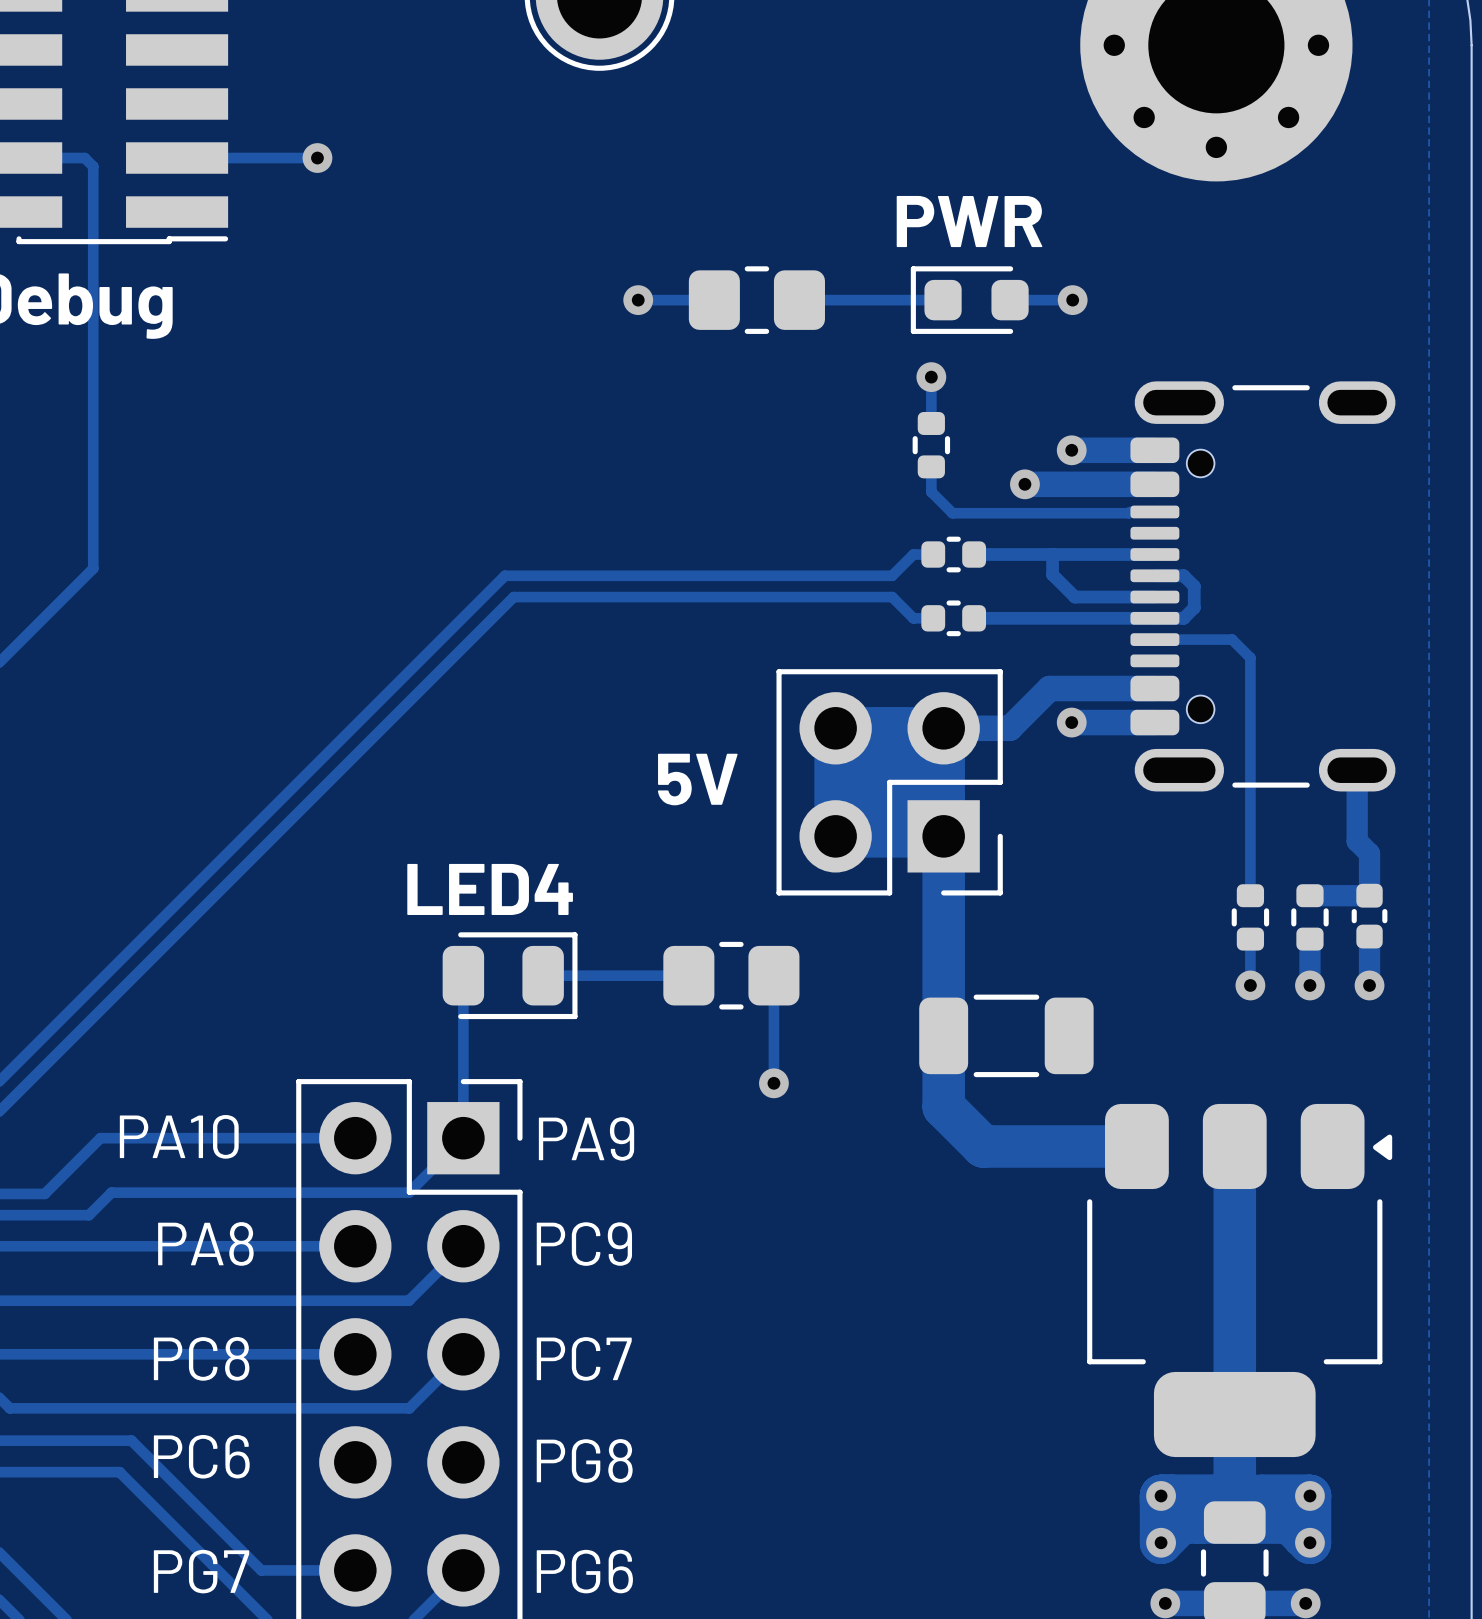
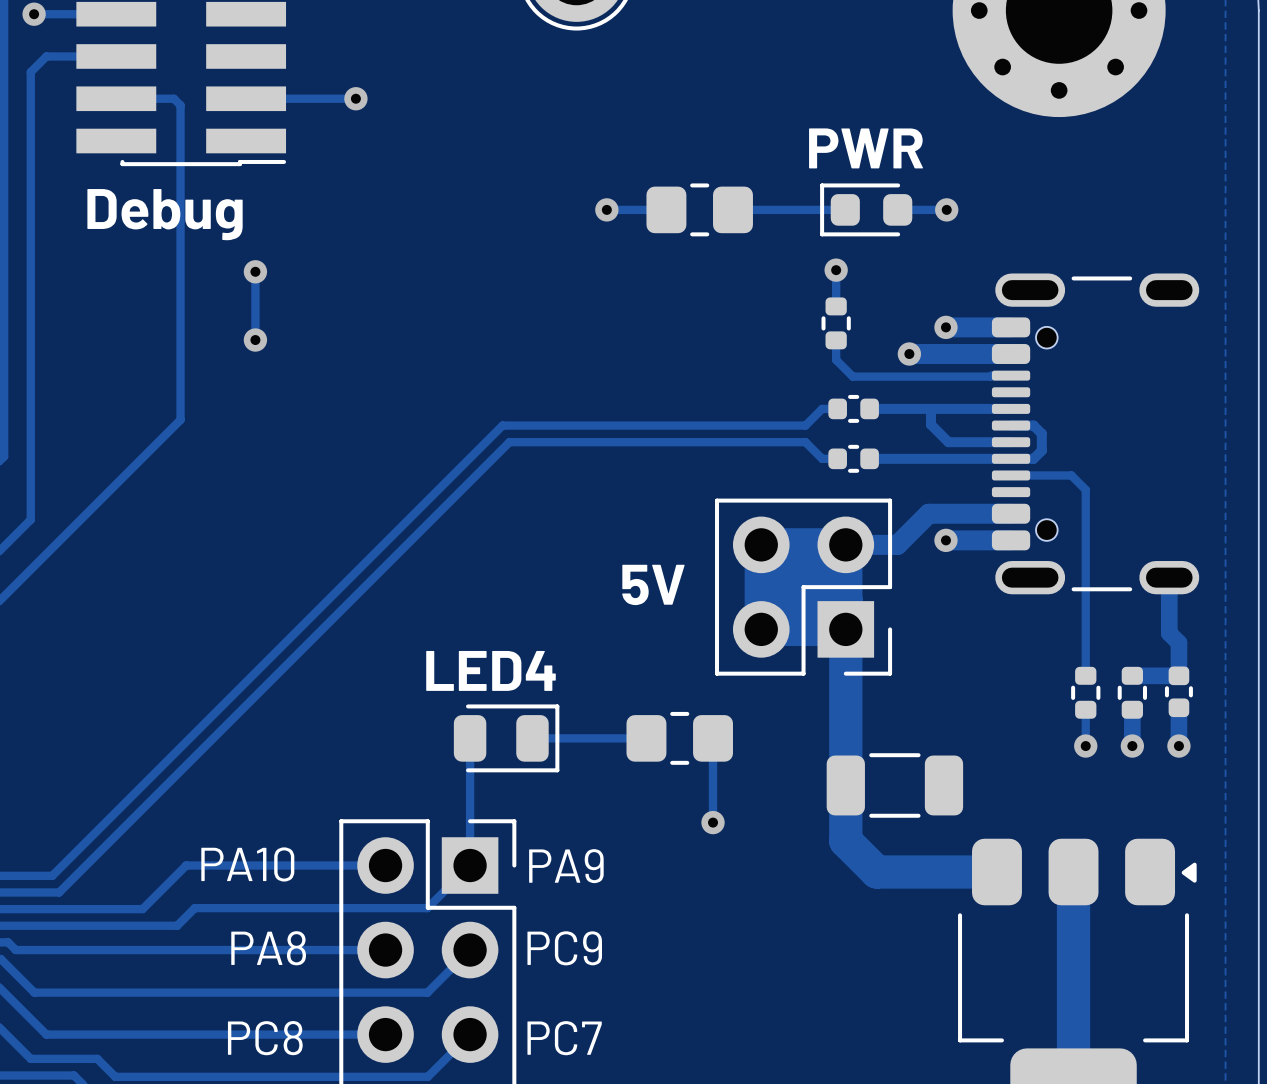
track: none -> (255, 271) (255, 340)
via: none -> (255, 271)
via: none -> (255, 340)

